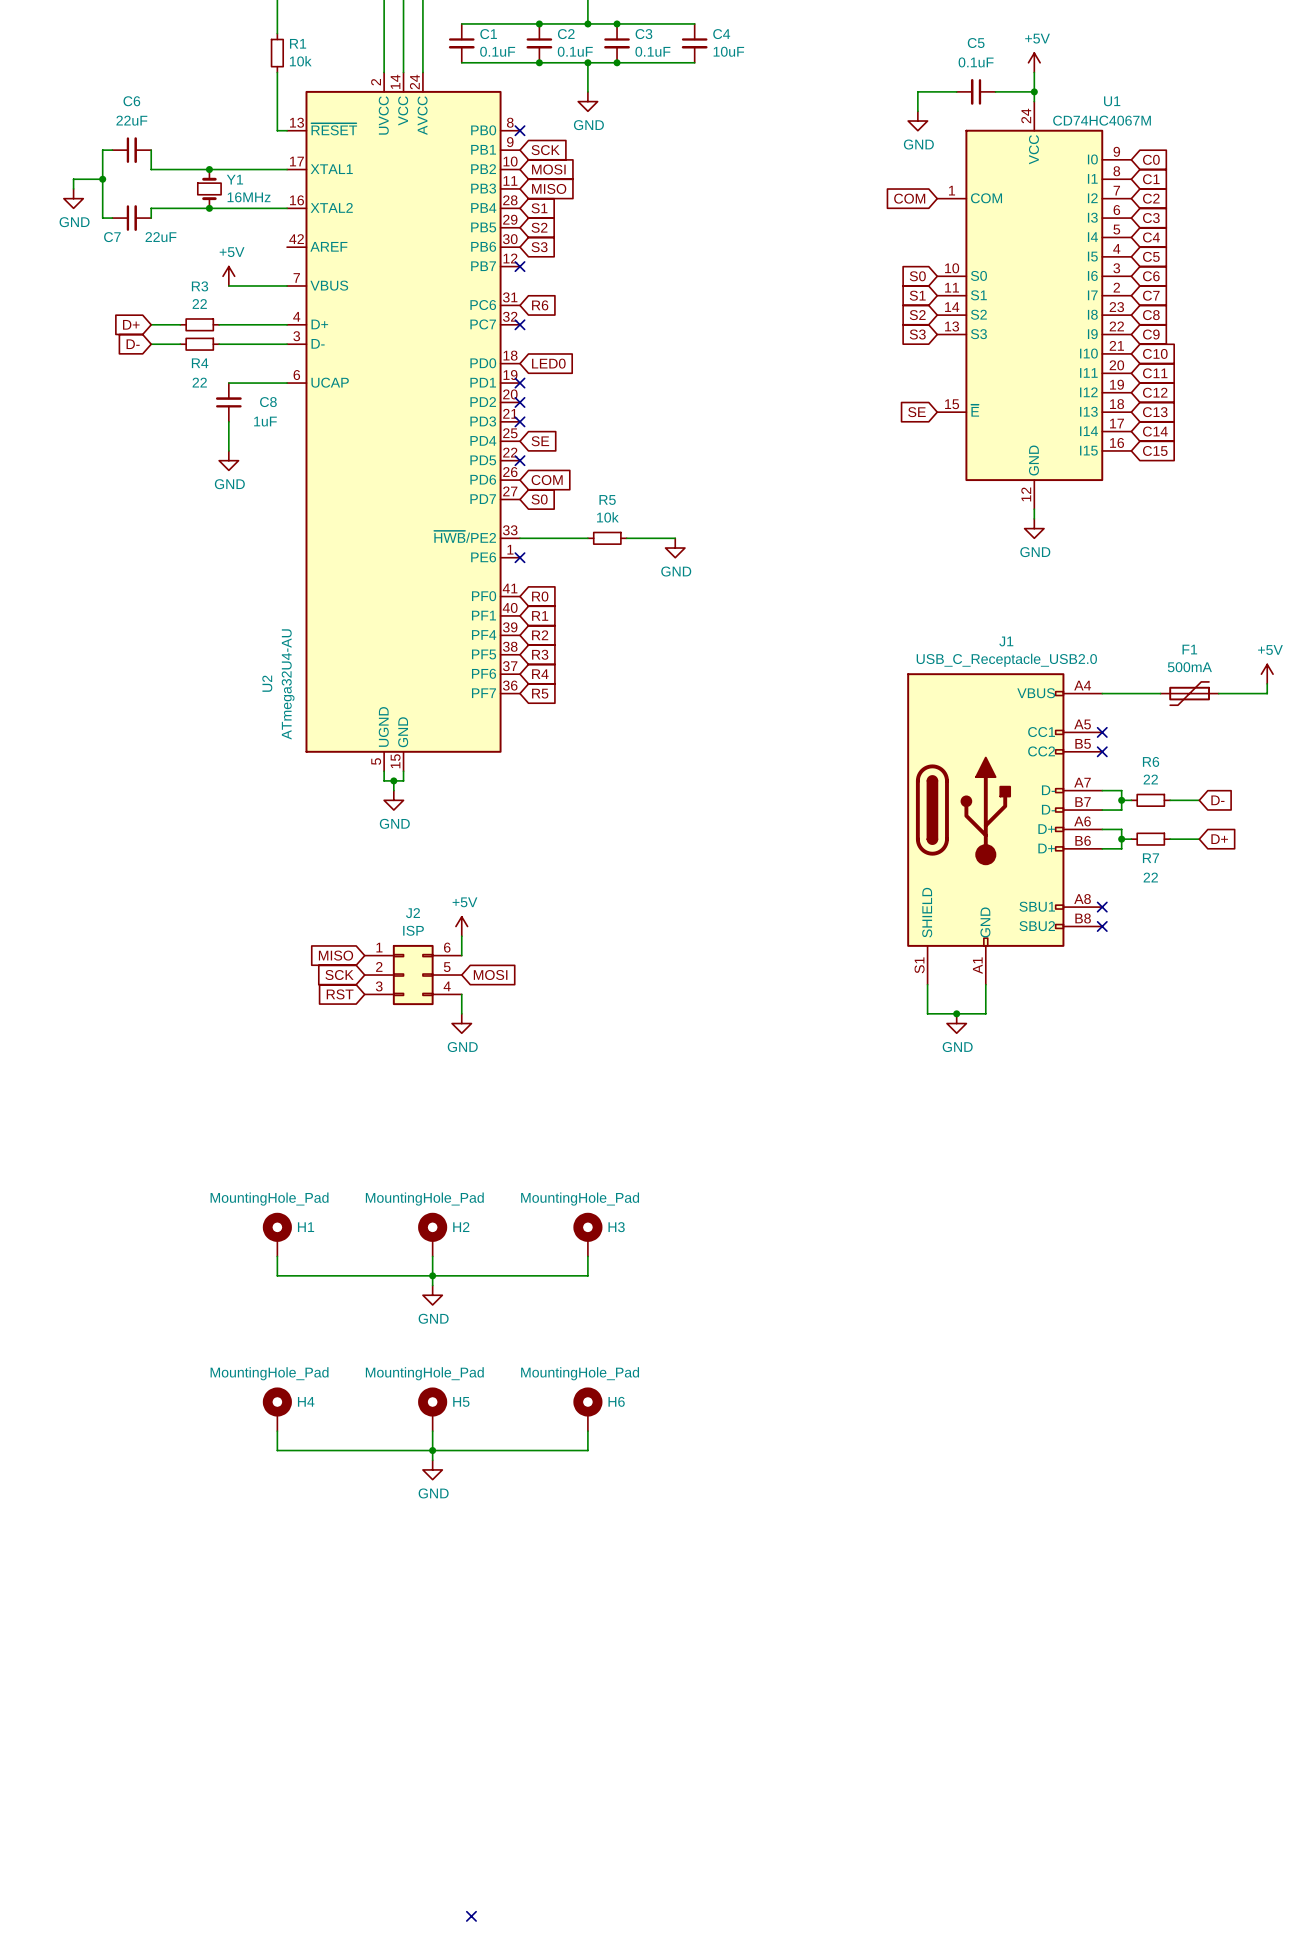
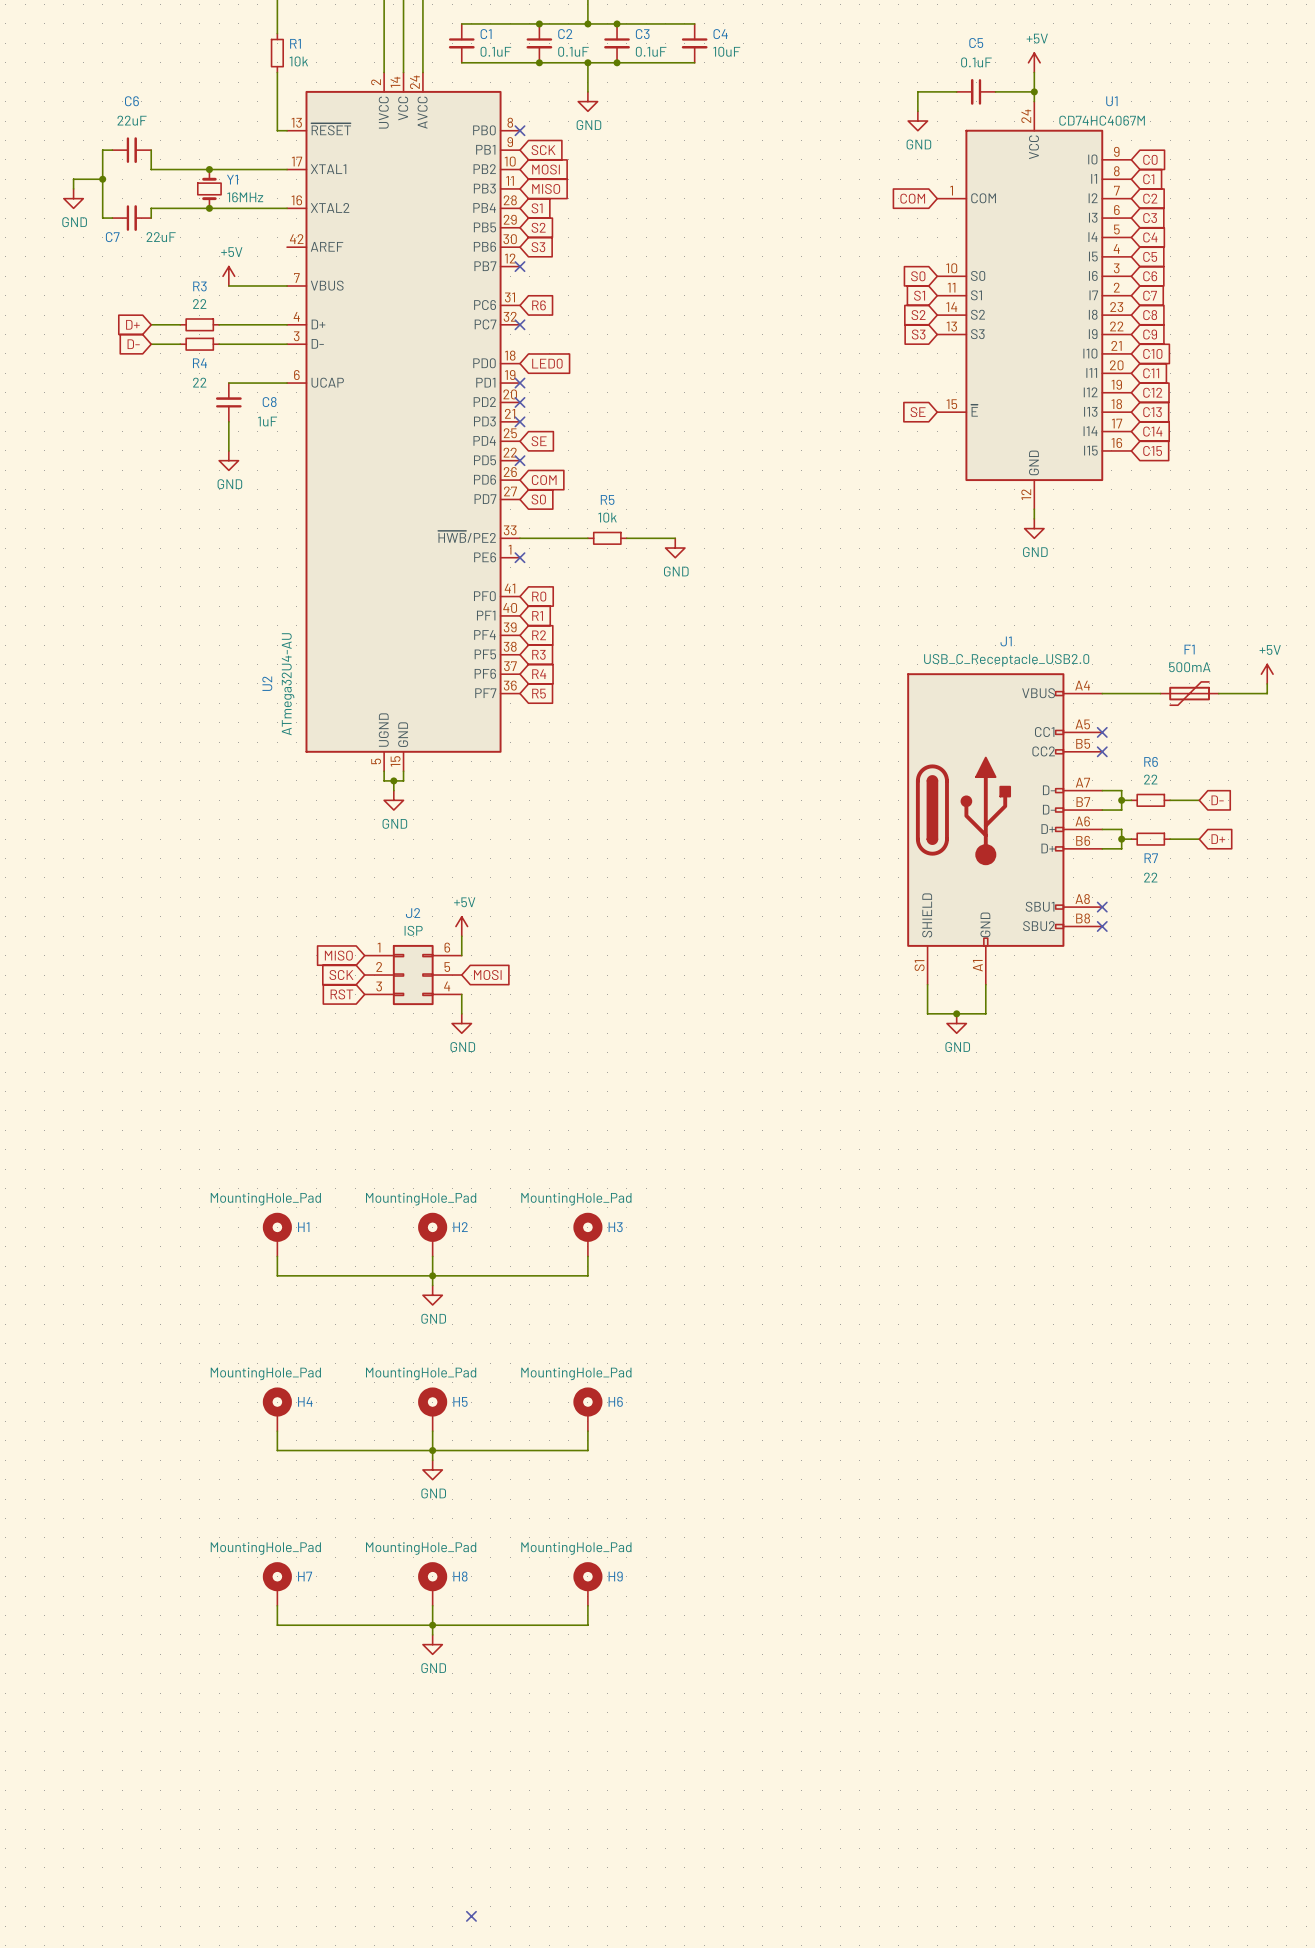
H7: none -> MountingHole_Pad (277, 1583)
H8: none -> MountingHole_Pad (432, 1583)
H9: none -> MountingHole_Pad (587, 1583)
wire: none -> (277, 1605) (277, 1625) (587, 1625) (587, 1605)
wire: none -> (432, 1605) (432, 1634)
junction: none -> (432, 1625)
power symbol: none -> GND (432, 1644)

